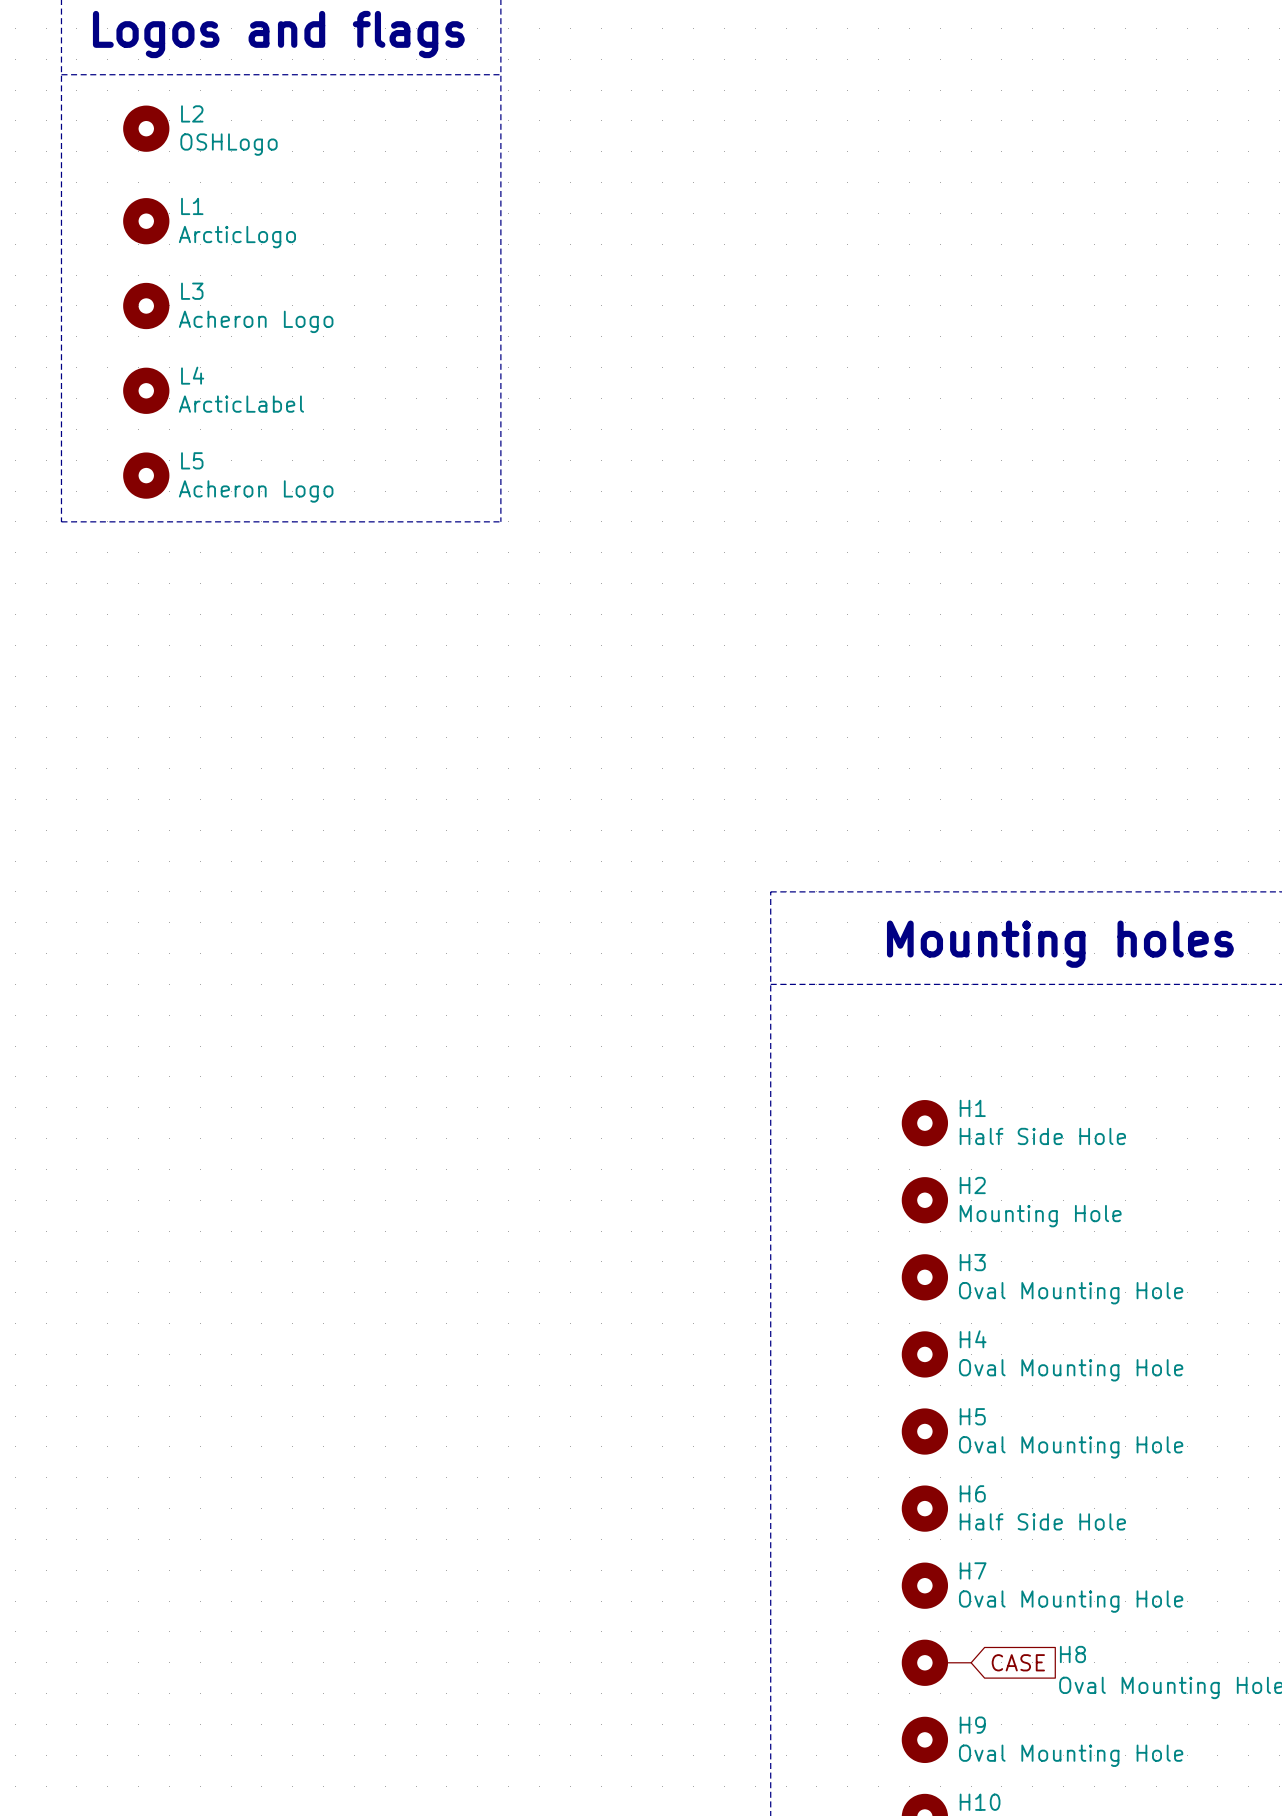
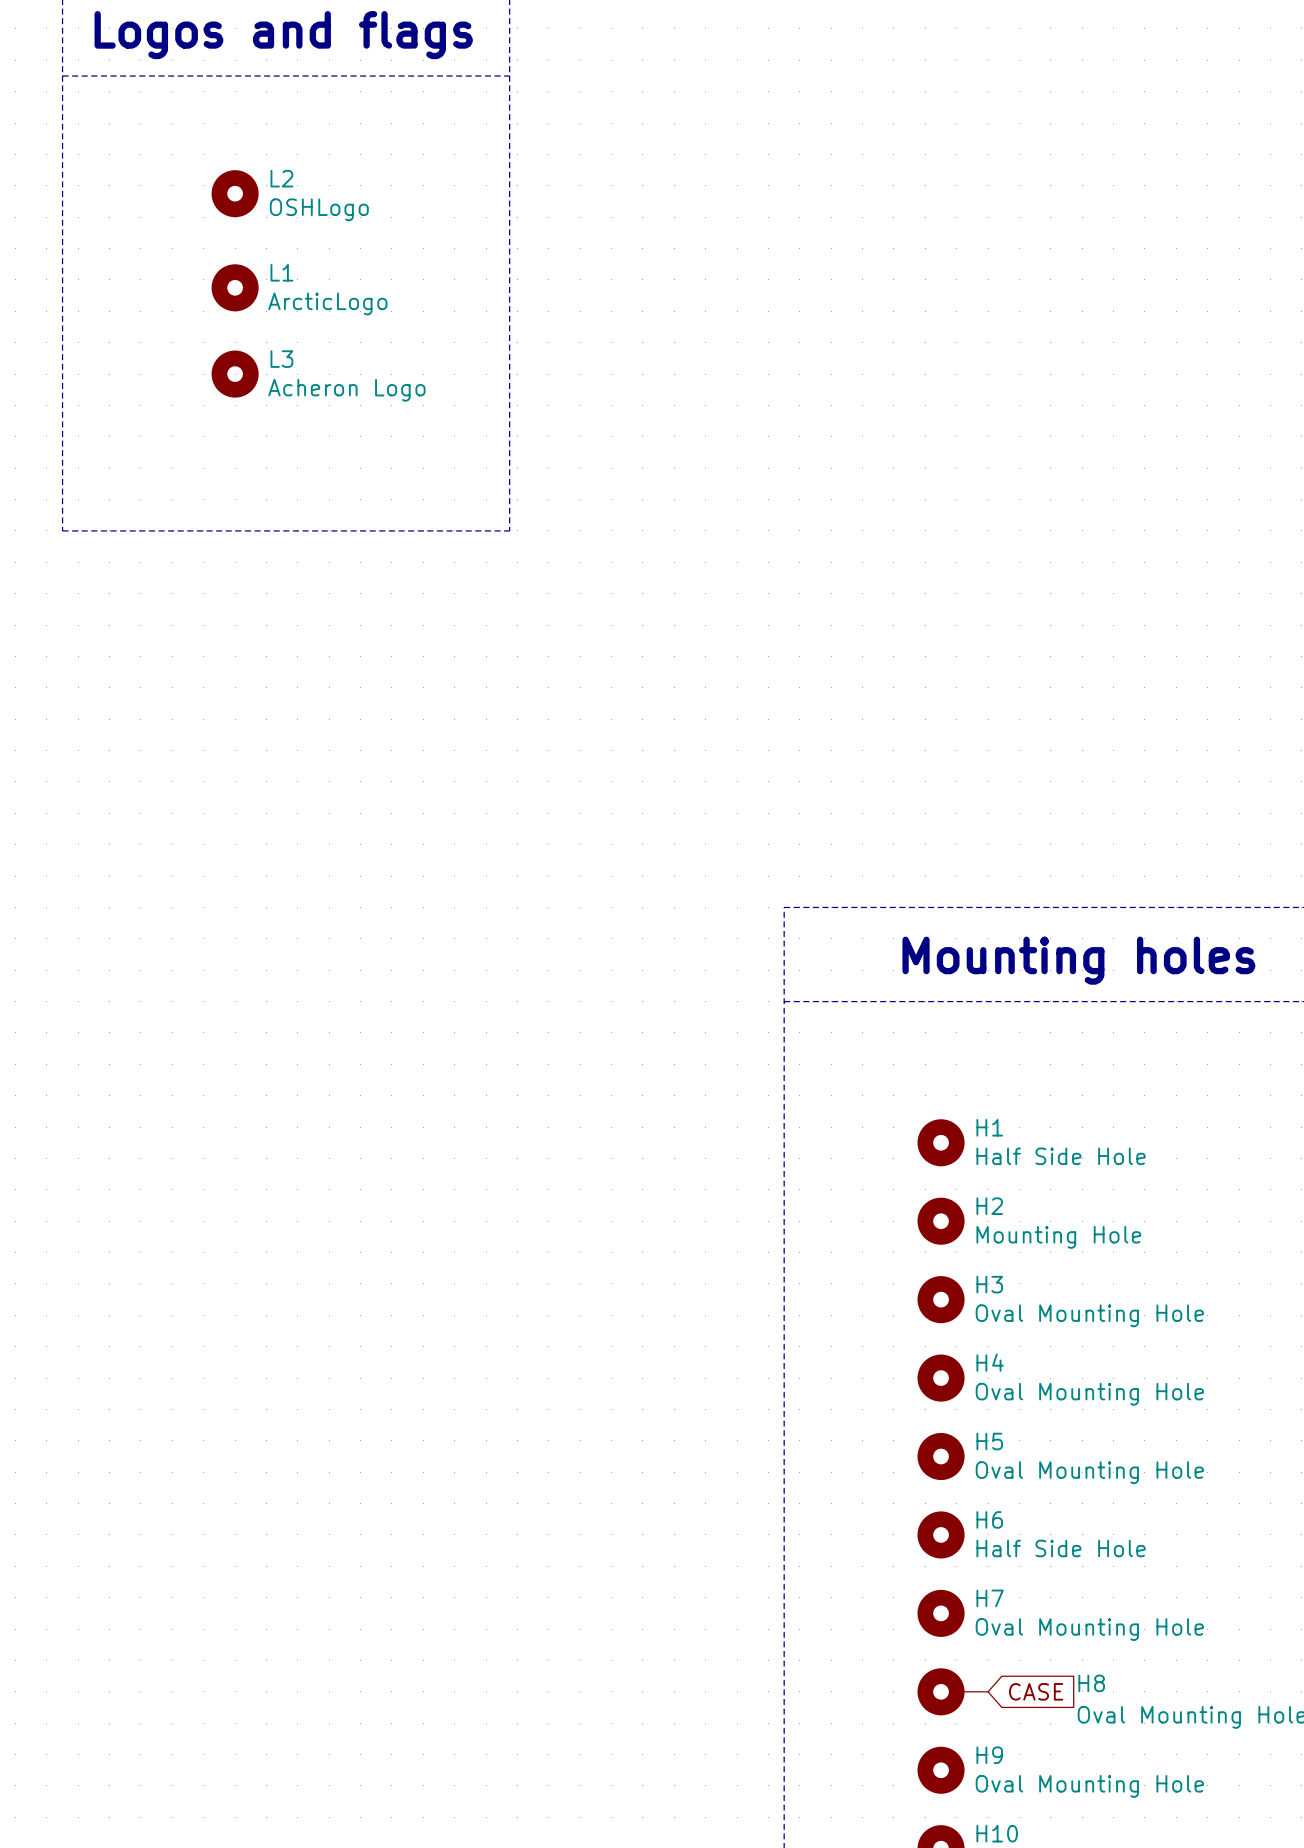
L2 position: (146, 128) -> (235, 193)
L1 position: (146, 221) -> (235, 287)
L3 position: (146, 305) -> (235, 374)
L4: ArcticLabel (146, 390) -> none
L5: Acheron Logo (146, 475) -> none

